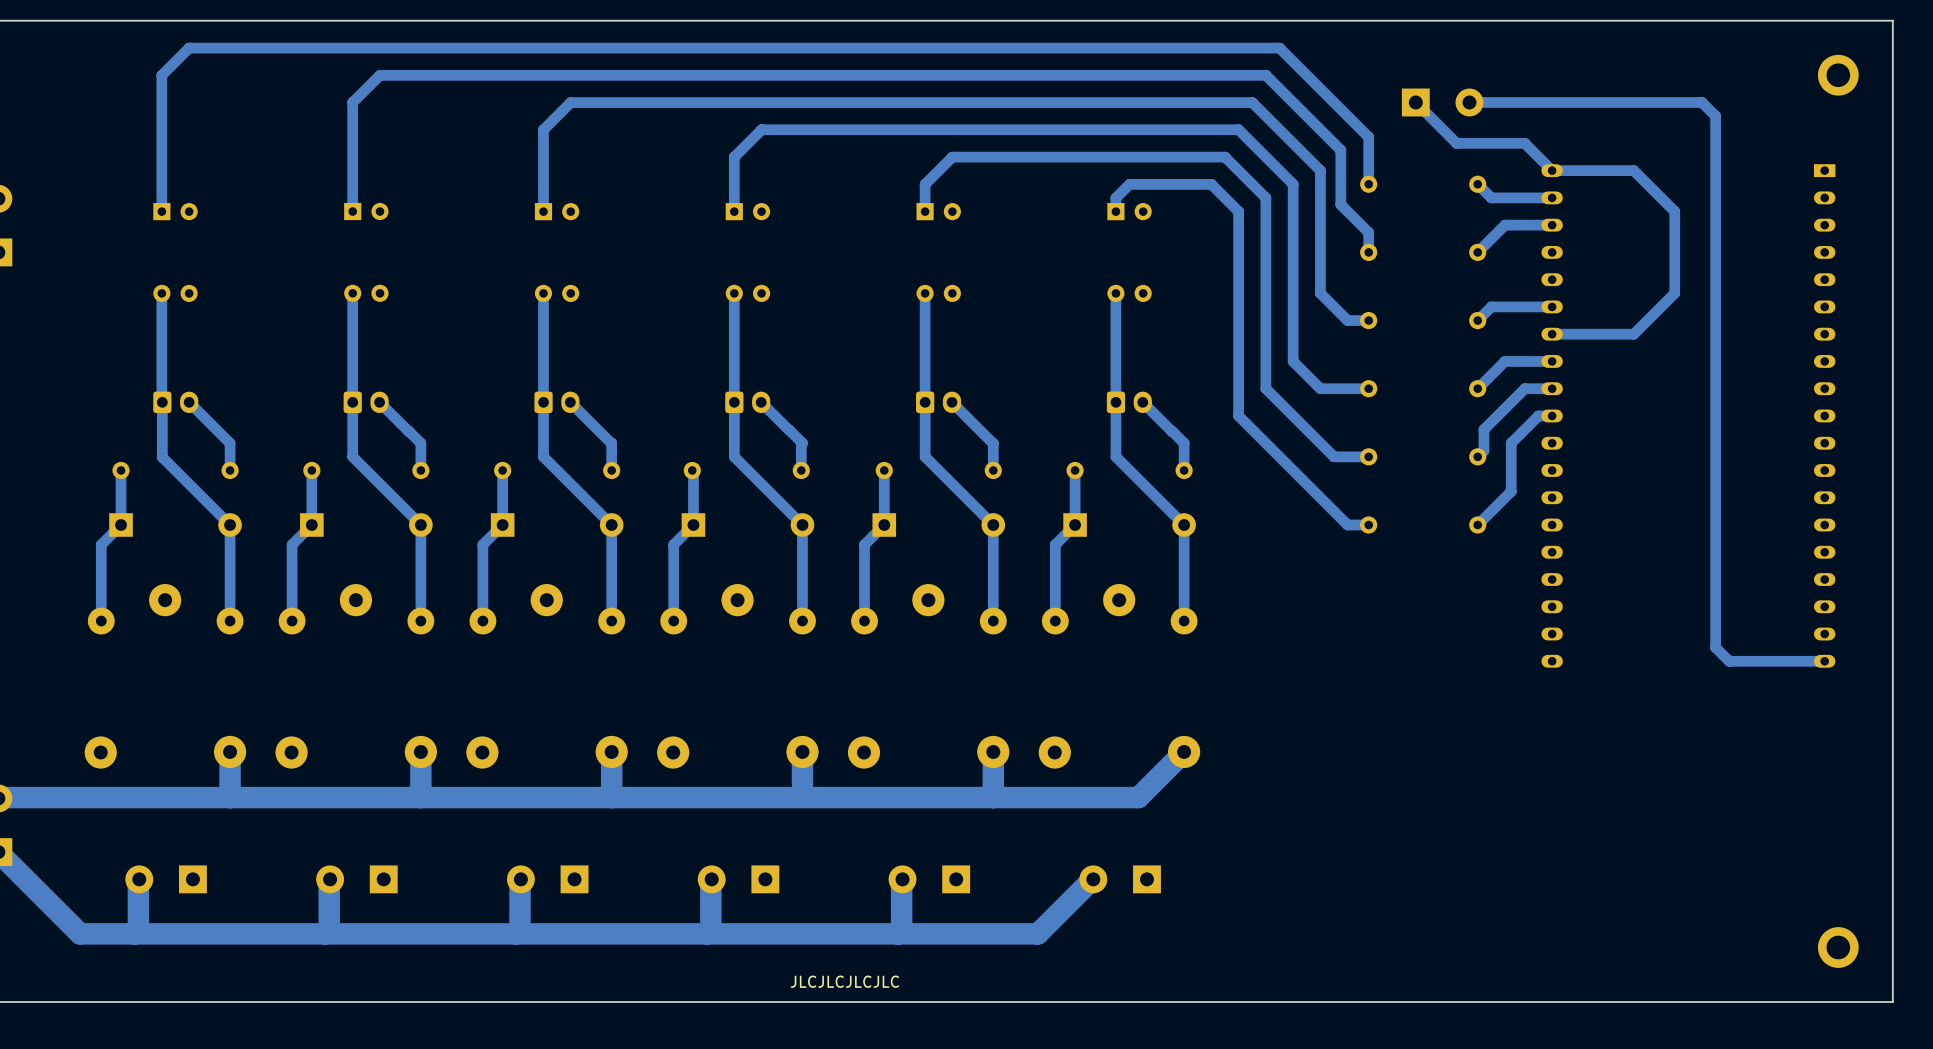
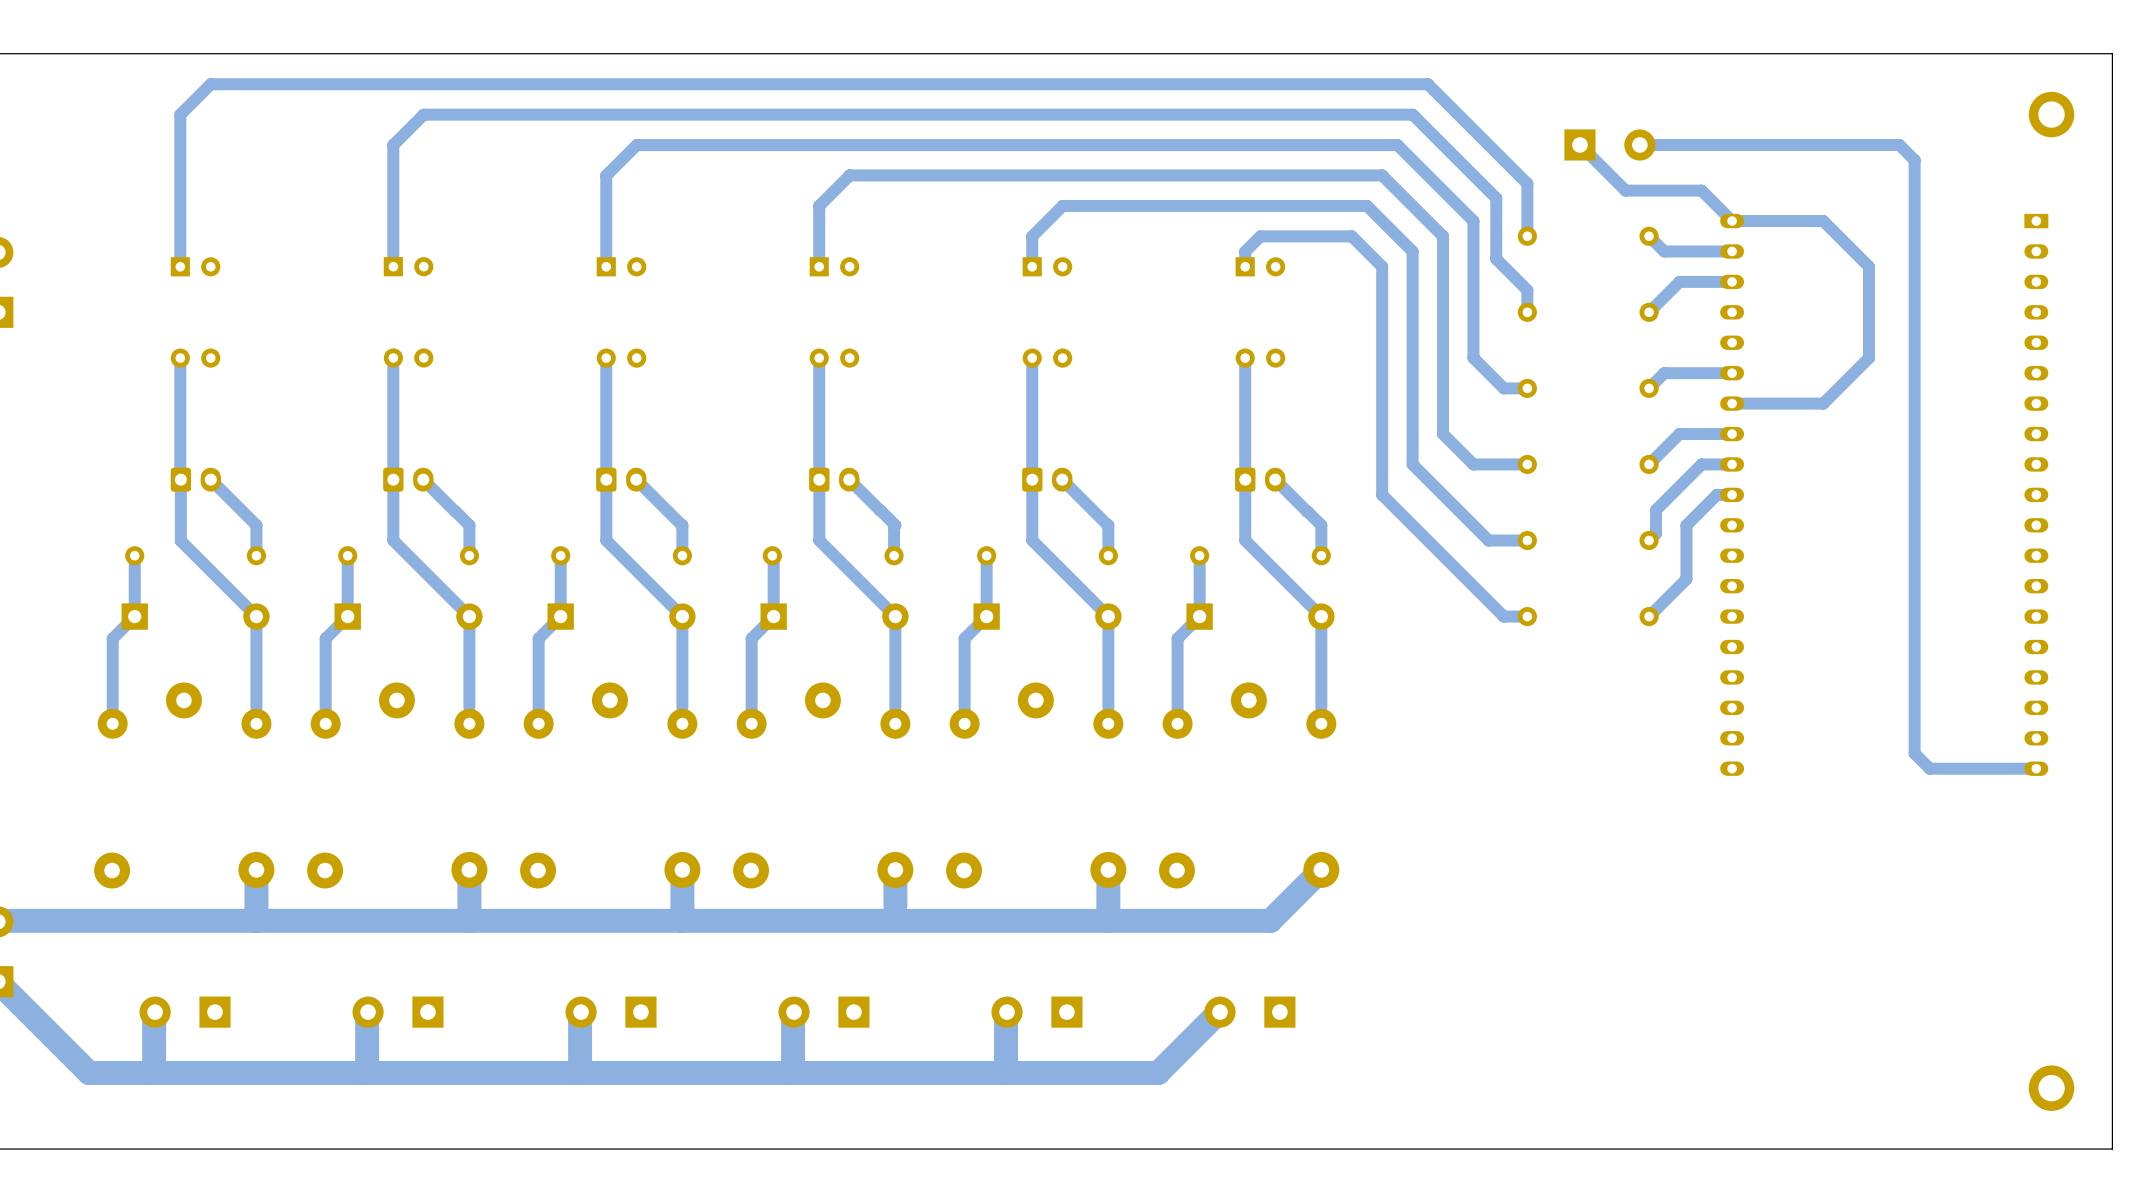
text: JLCJLCJLCJLC (844, 981) -> none

